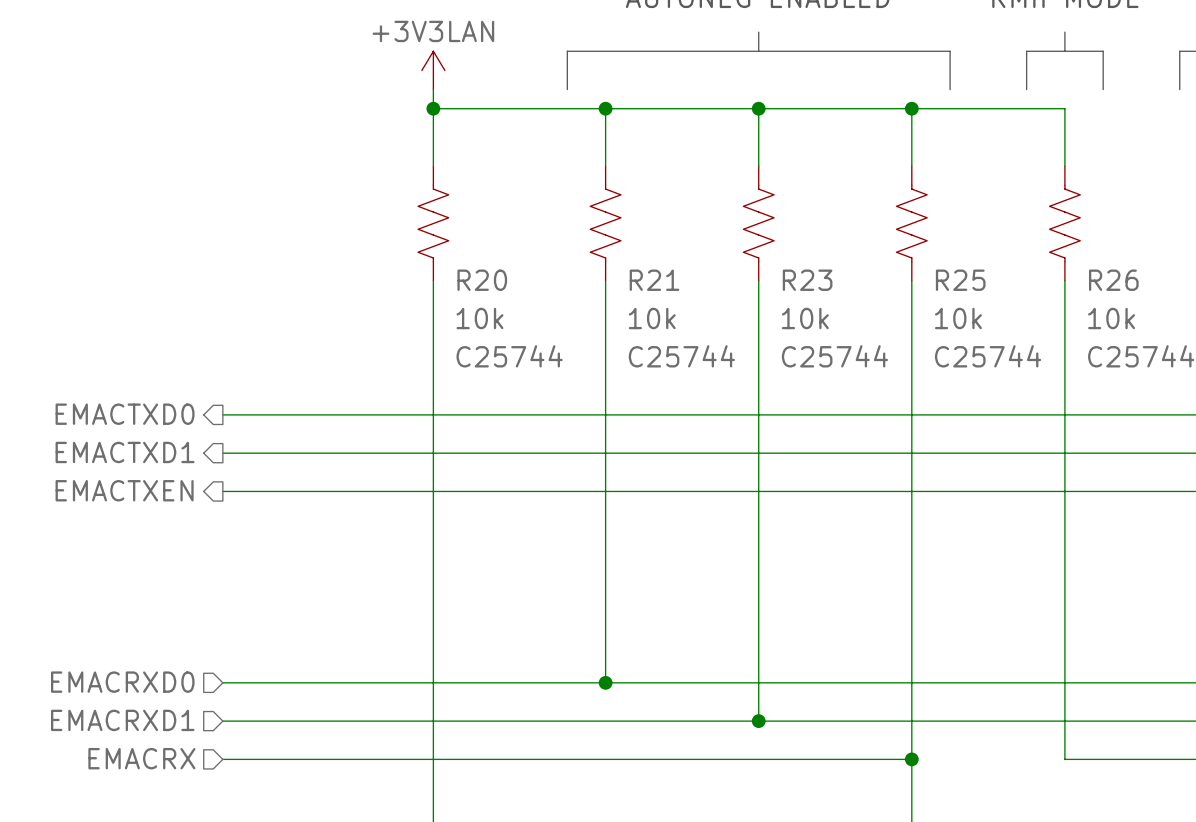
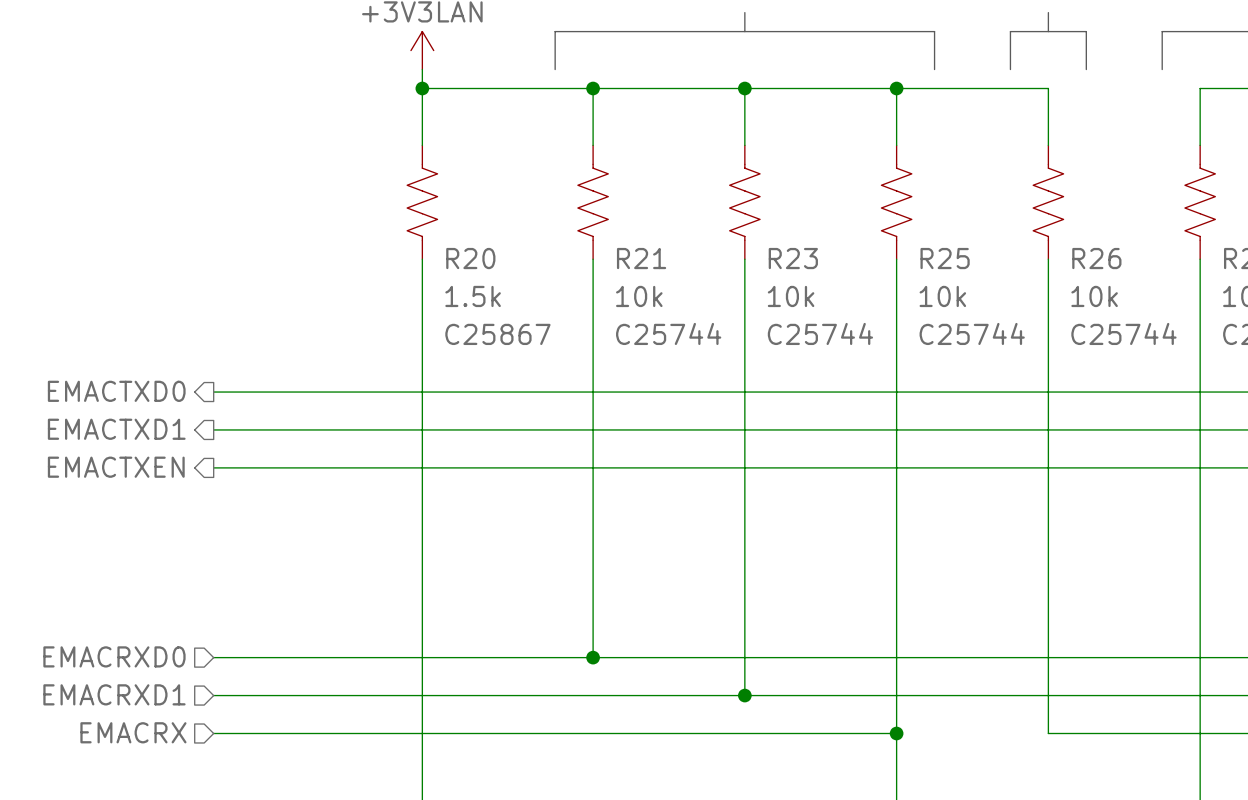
R20 value: 10k (479, 318) -> 1.5k (473, 296)
R20 text: C25744 (509, 356) -> C25867 (497, 334)

